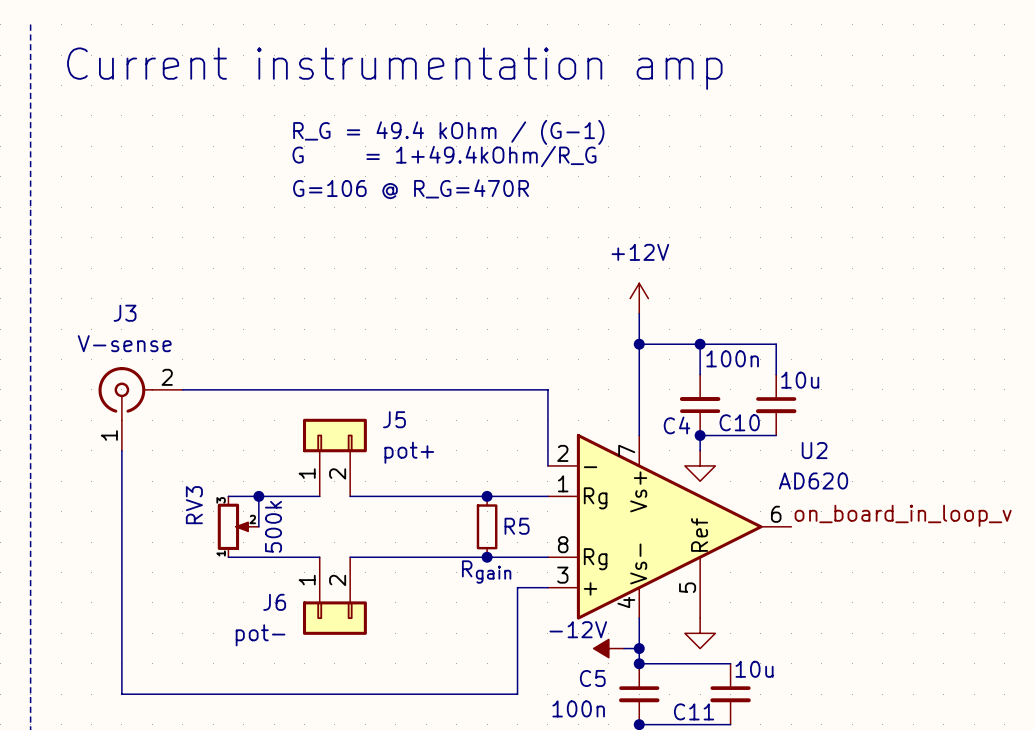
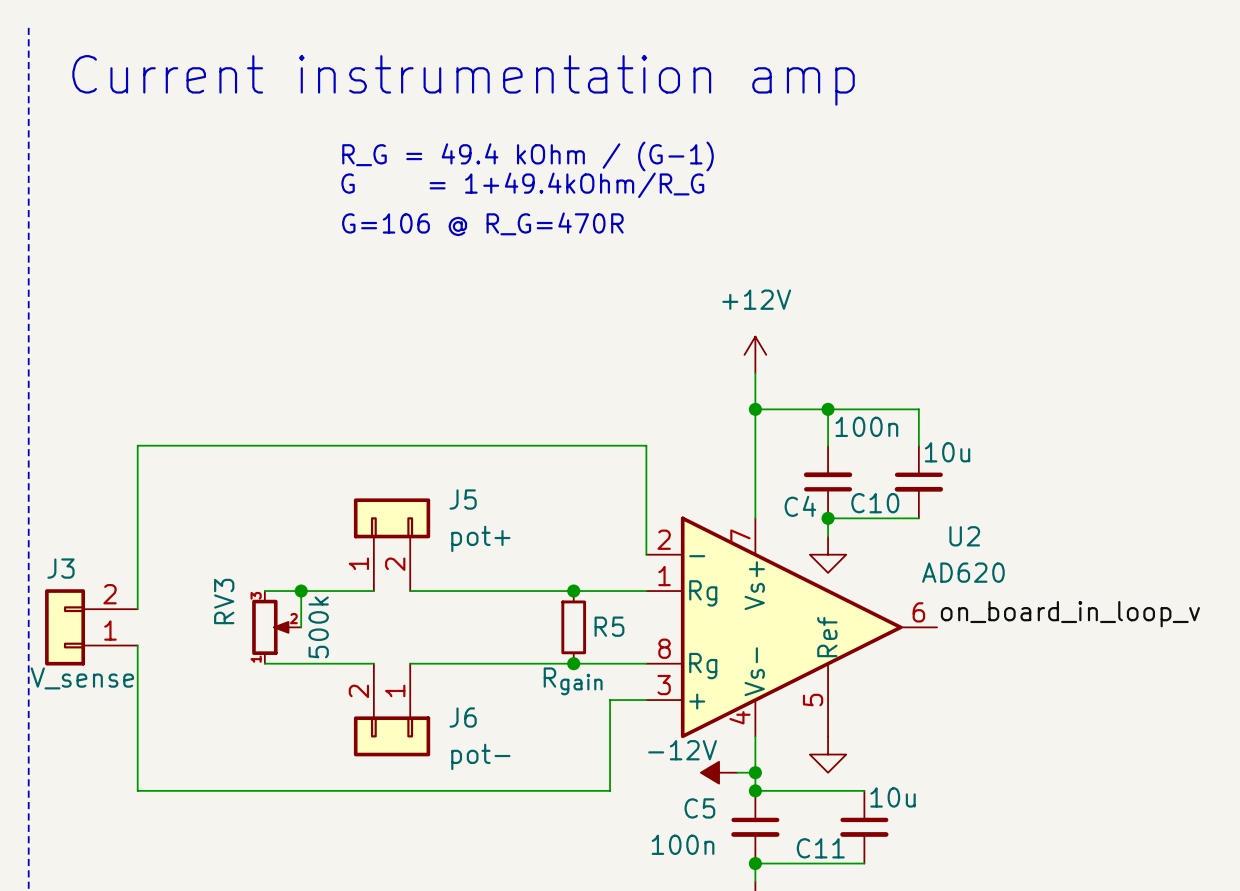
J3 name position: J3 (125, 313) -> J3 (60, 568)
J3 value: V-sense (124, 343) -> V_sense (82, 678)
J3 symbol: [98, 367, 183, 451] -> [45, 589, 138, 666]
wire: (182, 389) (547, 389) -> (137, 536) (137, 445) (646, 445) (646, 463)
wire: (121, 511) (121, 542) -> none
J6 flip: as is (334, 618) -> left-right (392, 736)
wire: (121, 663) (121, 694) (517, 694) (517, 663) -> (137, 790) (610, 790)

